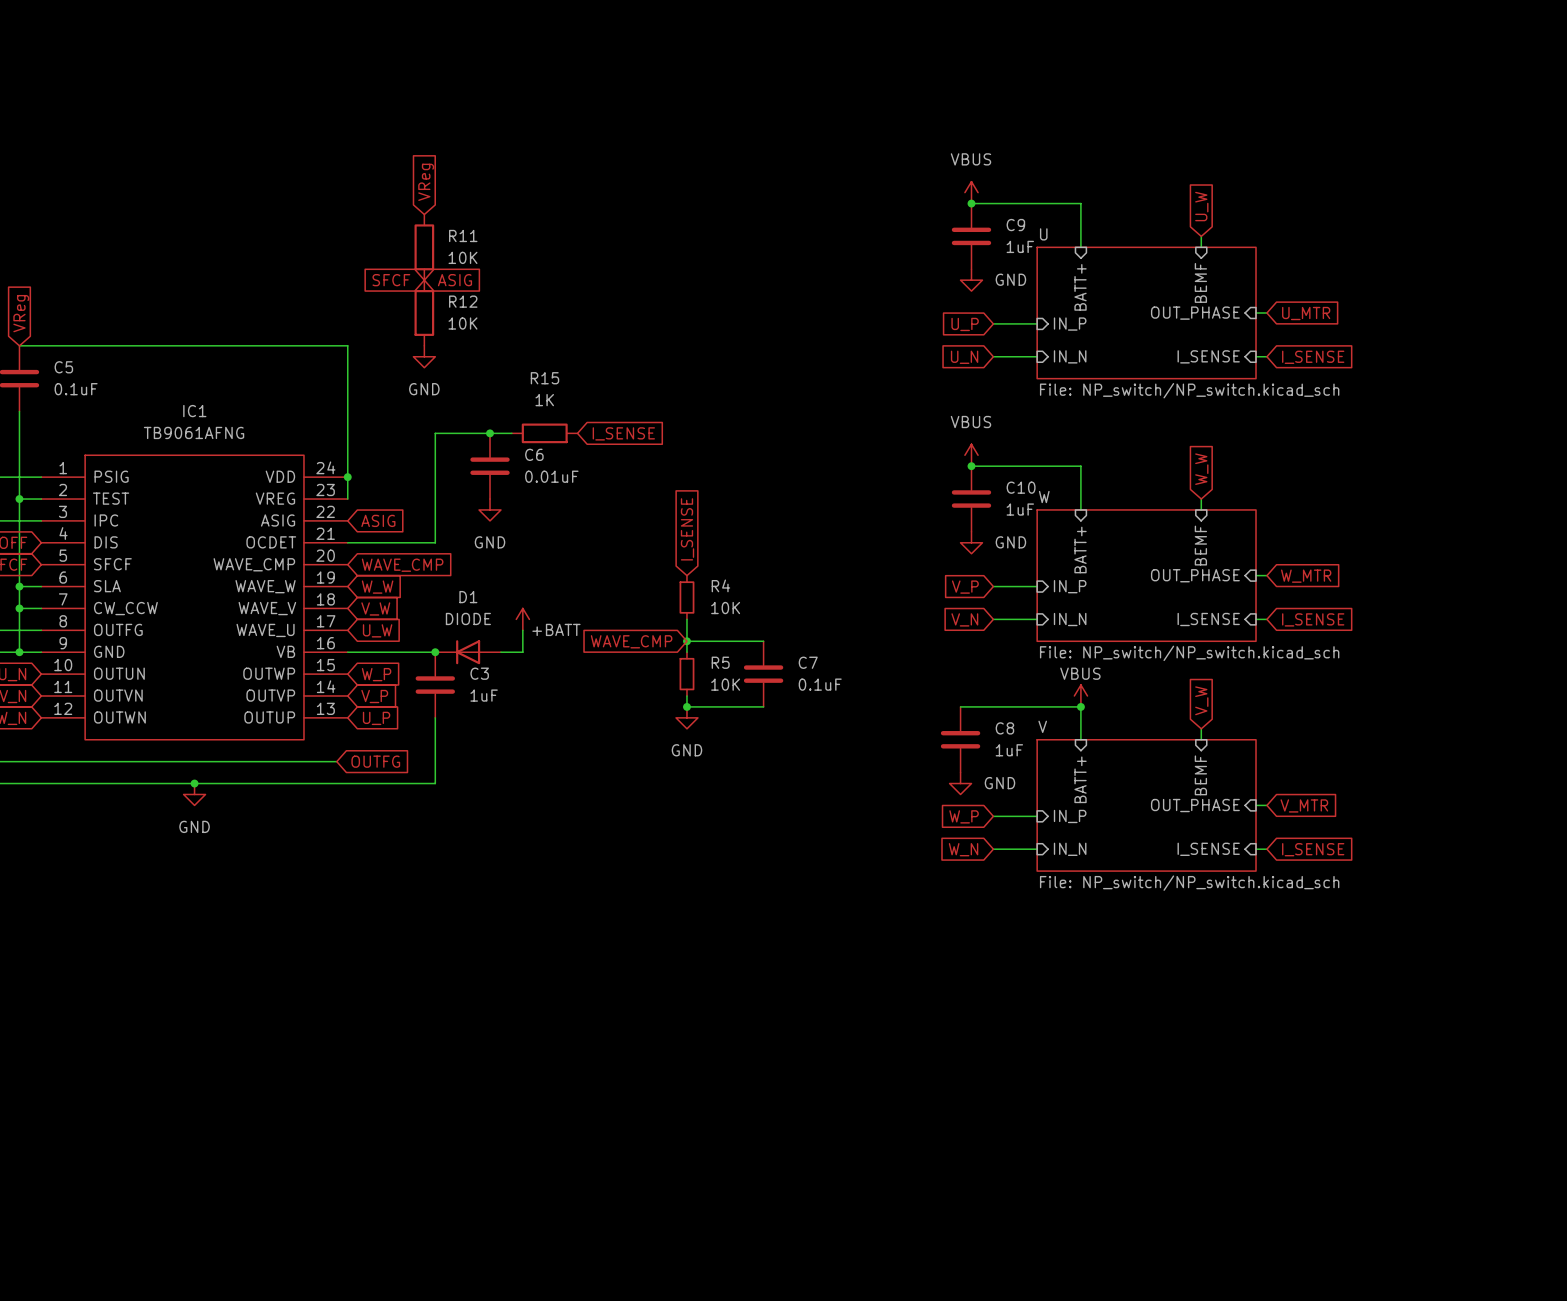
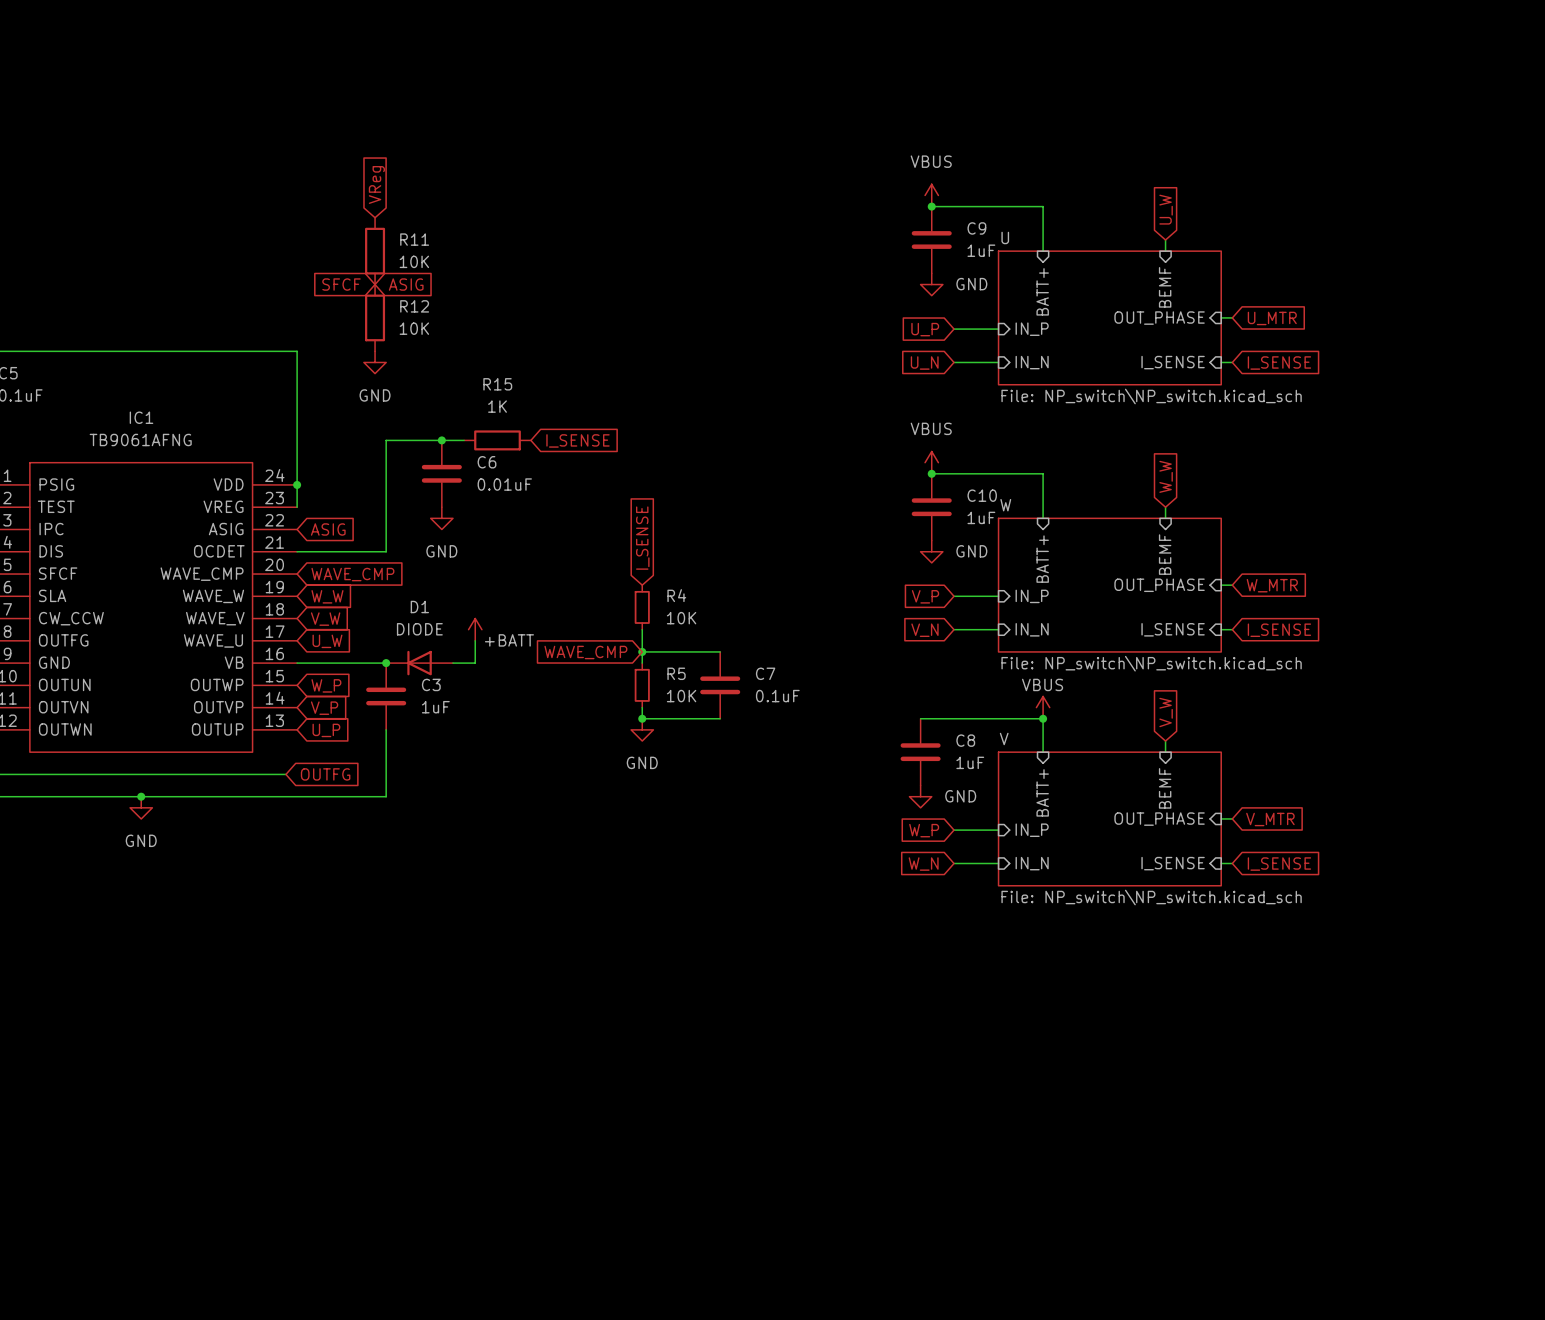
sheet U value: File: NP_switch/NP_switch.kicad_sch (1189, 390) -> File: NP_switch\NP_switch.kicad_sch (1151, 396)
sheet W value: File: NP_switch/NP_switch.kicad_sch (1189, 653) -> File: NP_switch\NP_switch.kicad_sch (1151, 663)
sheet V value: File: NP_switch/NP_switch.kicad_sch (1189, 883) -> File: NP_switch\NP_switch.kicad_sch (1151, 897)

